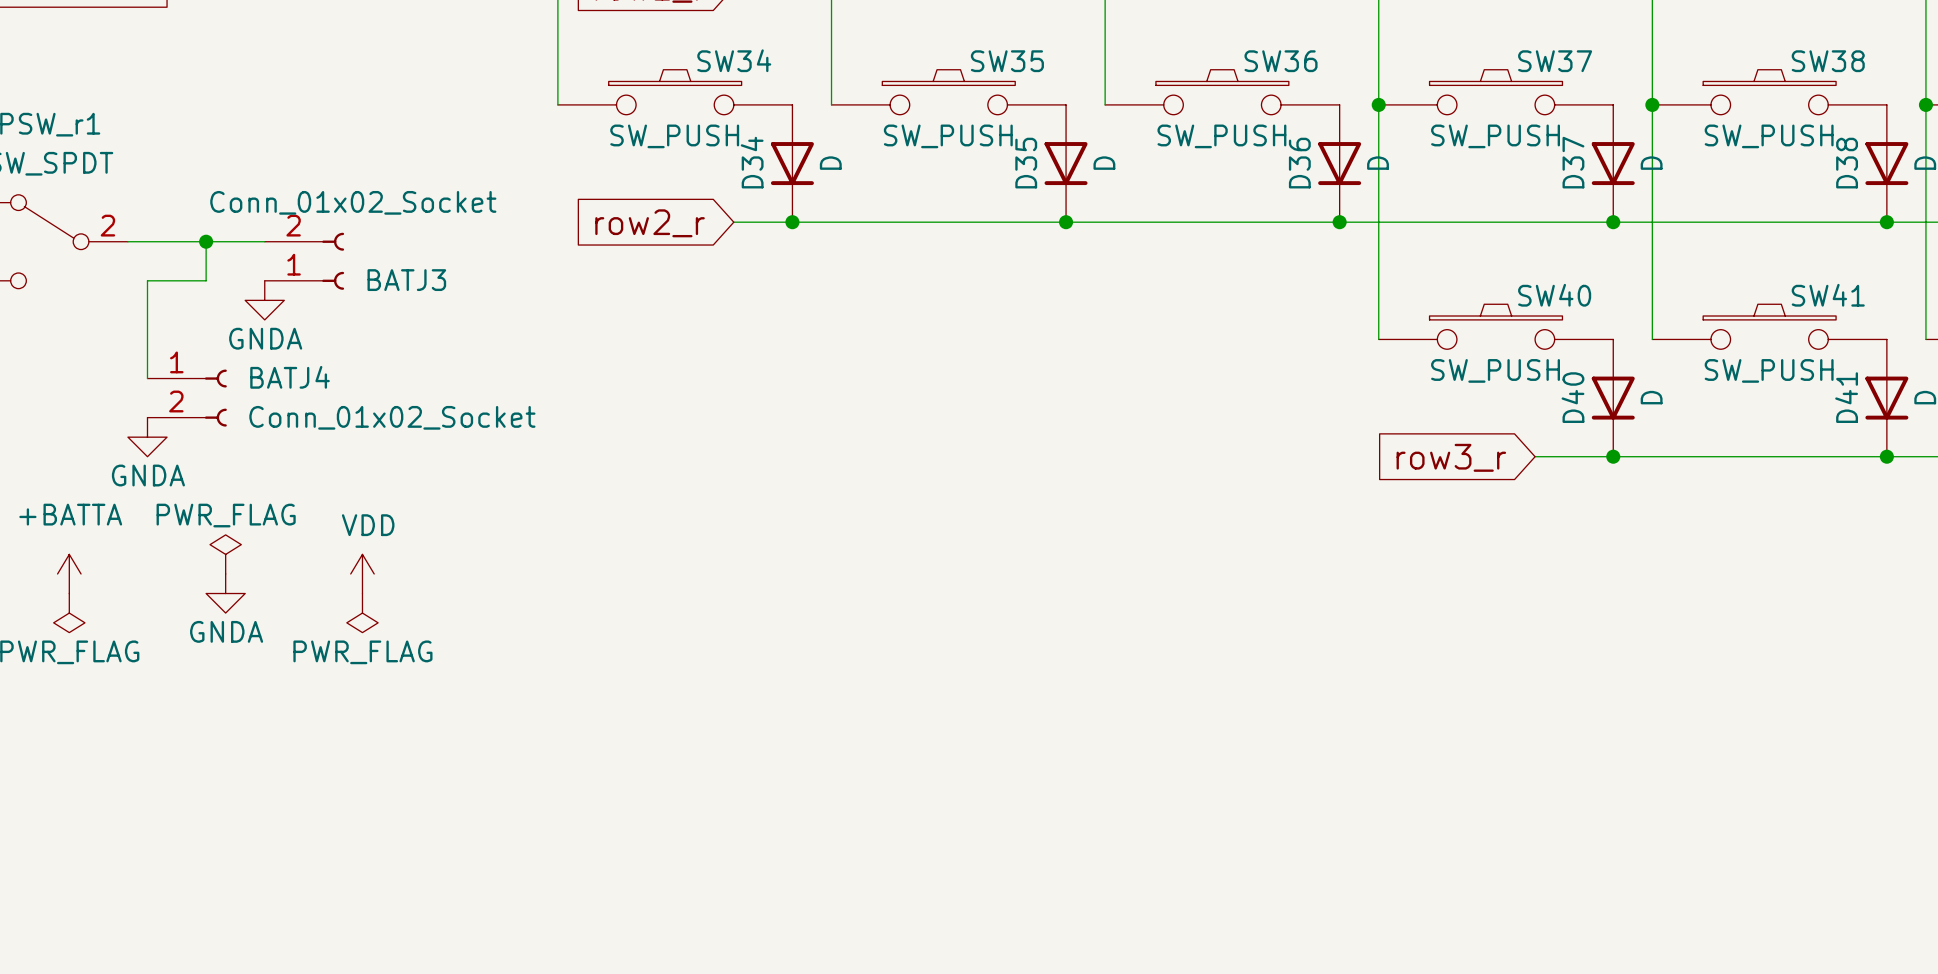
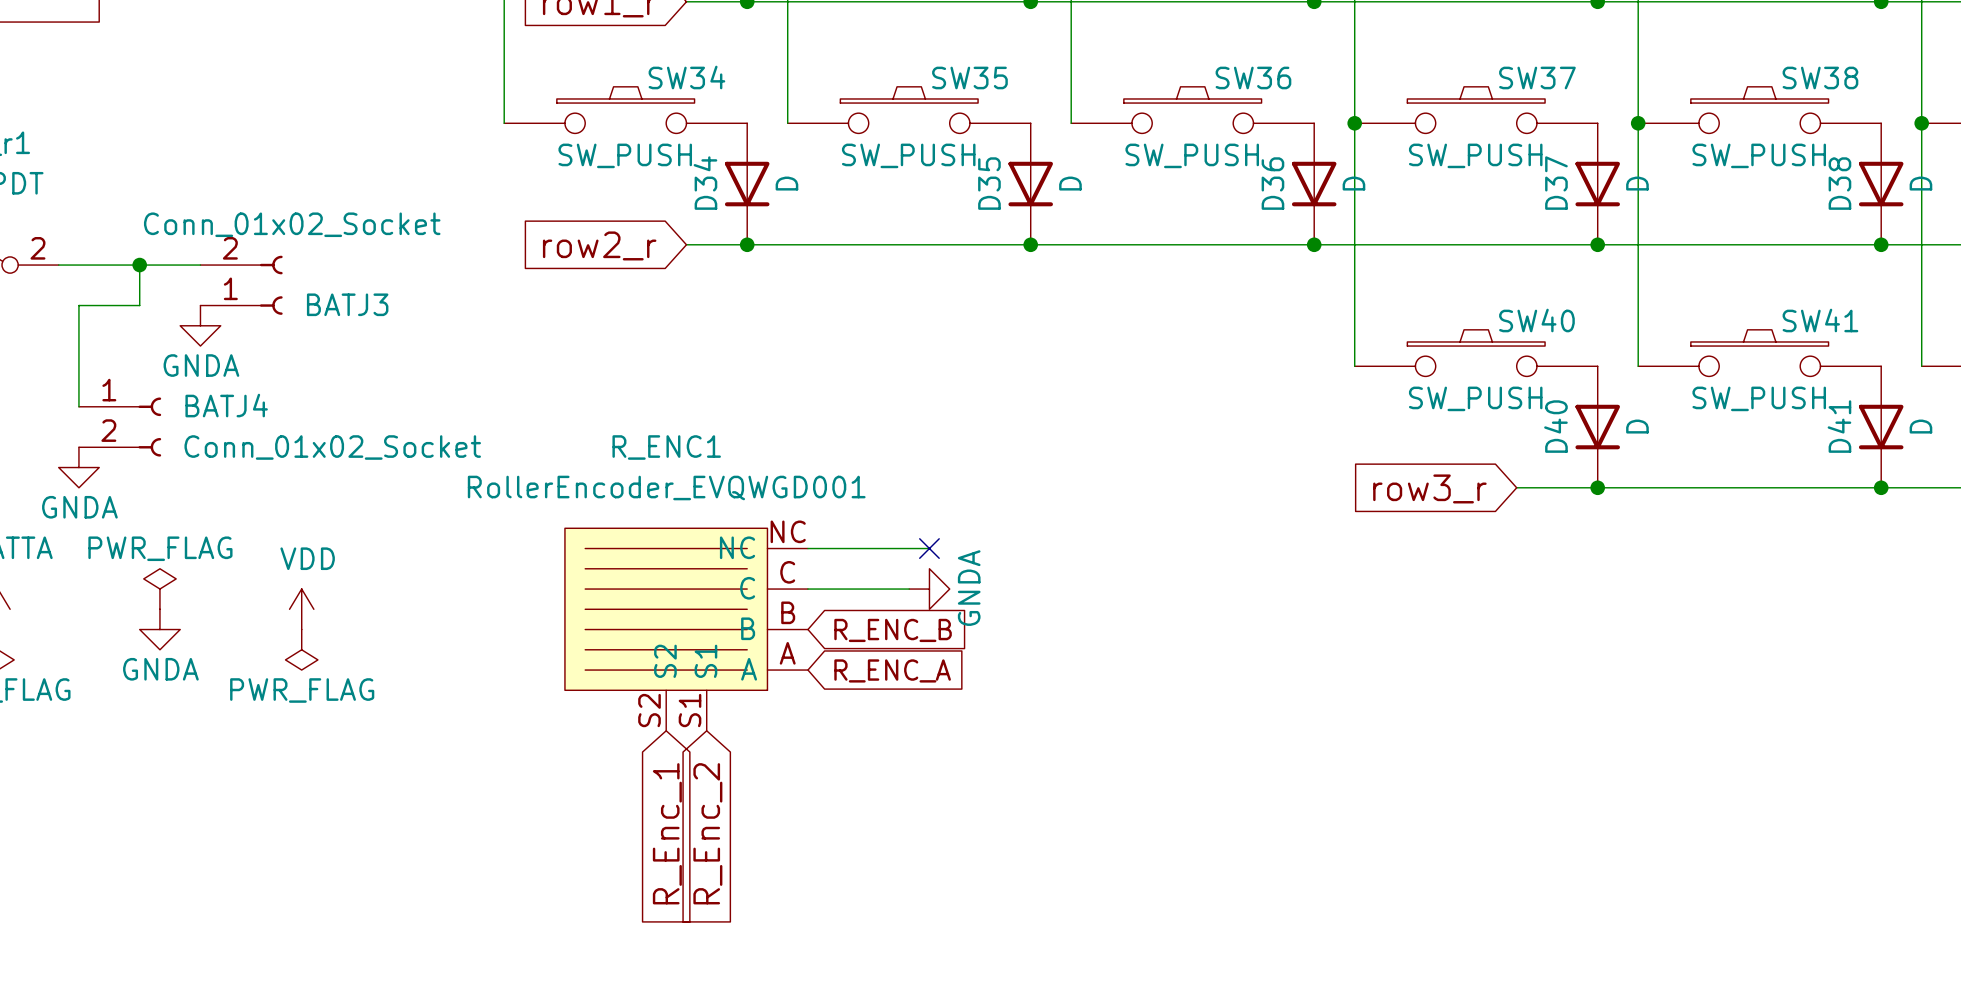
wire: none -> (807, 548) (929, 548)
no-connect mark: none -> (929, 548)
wire: none -> (807, 589) (909, 589)
power symbol: none -> GNDA (929, 589)
R_ENC1: none -> RollerEncoder_EVQWGD001 (686, 629)
global label: none -> R_ENC_B (893, 630)
global label: none -> R_ENC_A (892, 670)
global label: none -> R_Enc_1 (667, 833)
global label: none -> R_Enc_2 (707, 833)

